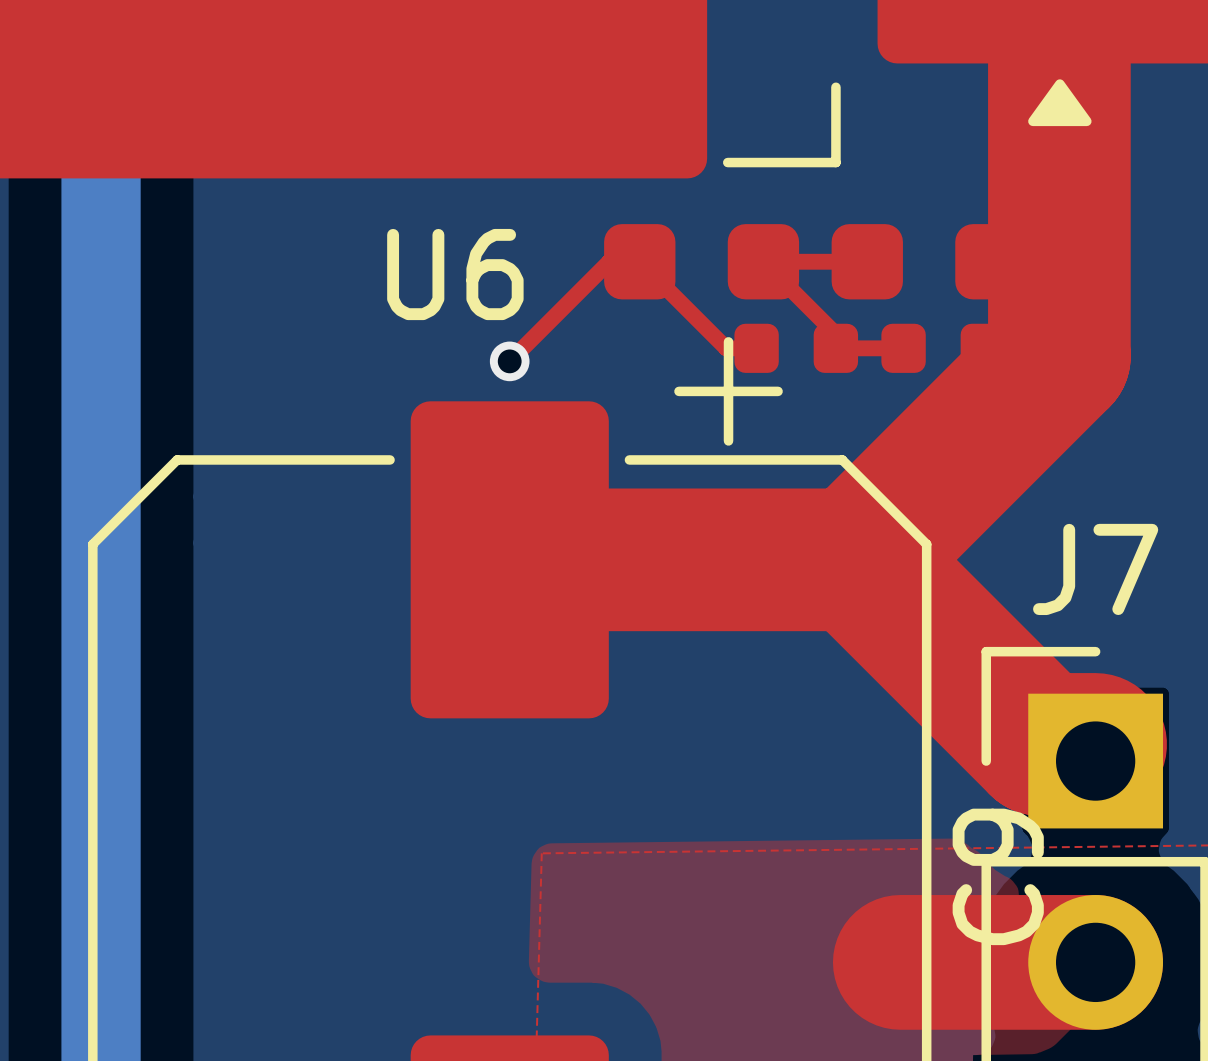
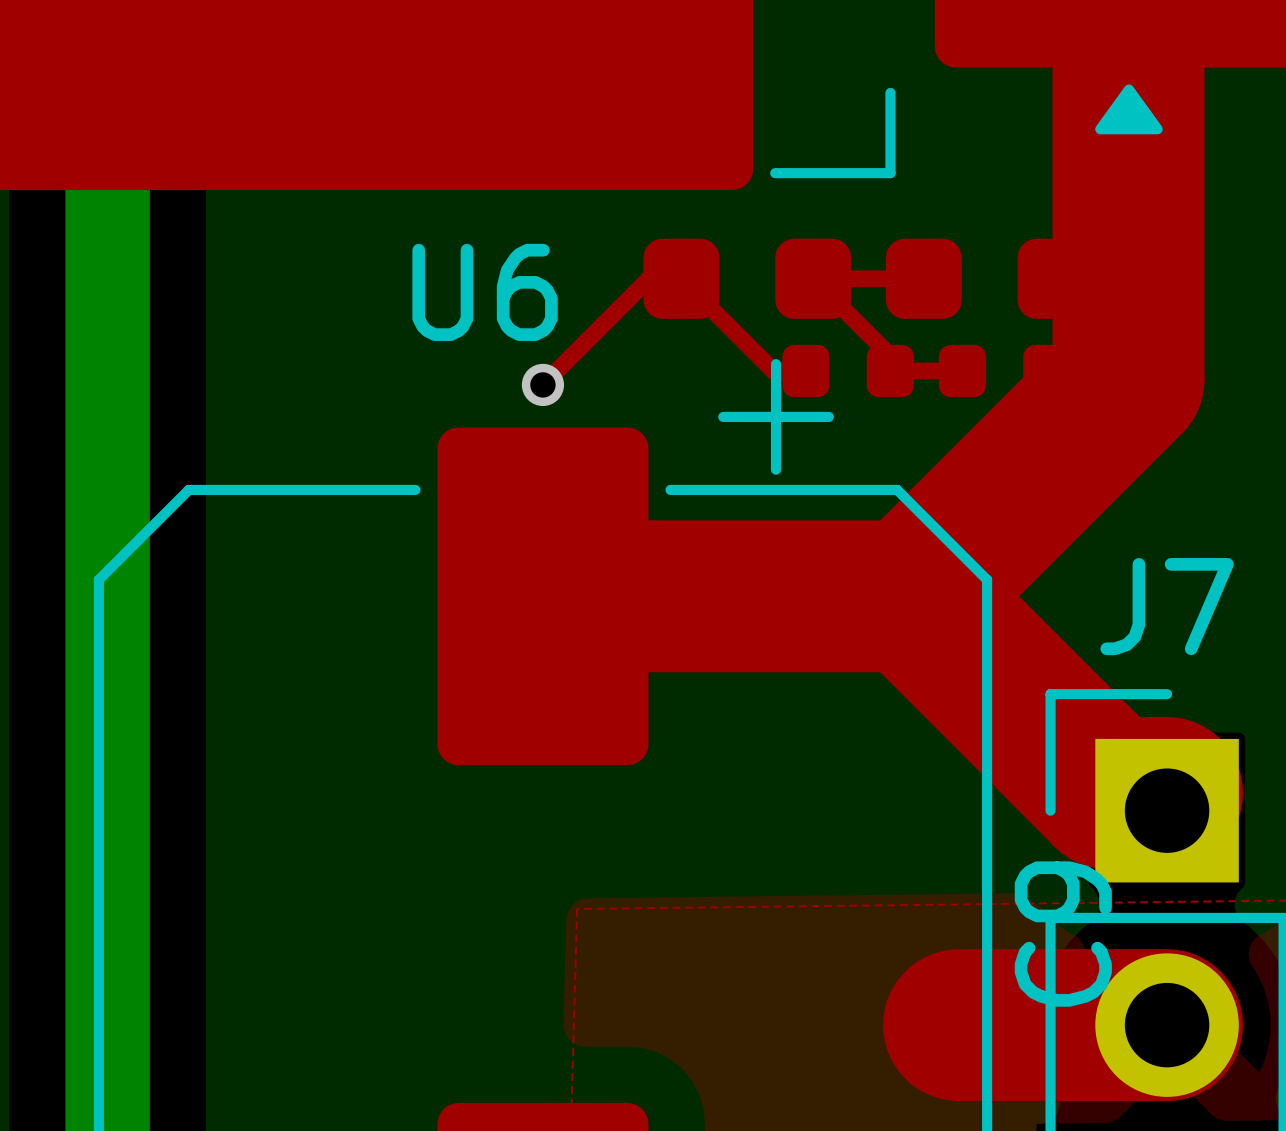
top track width: thin (900, 962) (1095, 962) -> thick (959, 1025) (1167, 1025)

